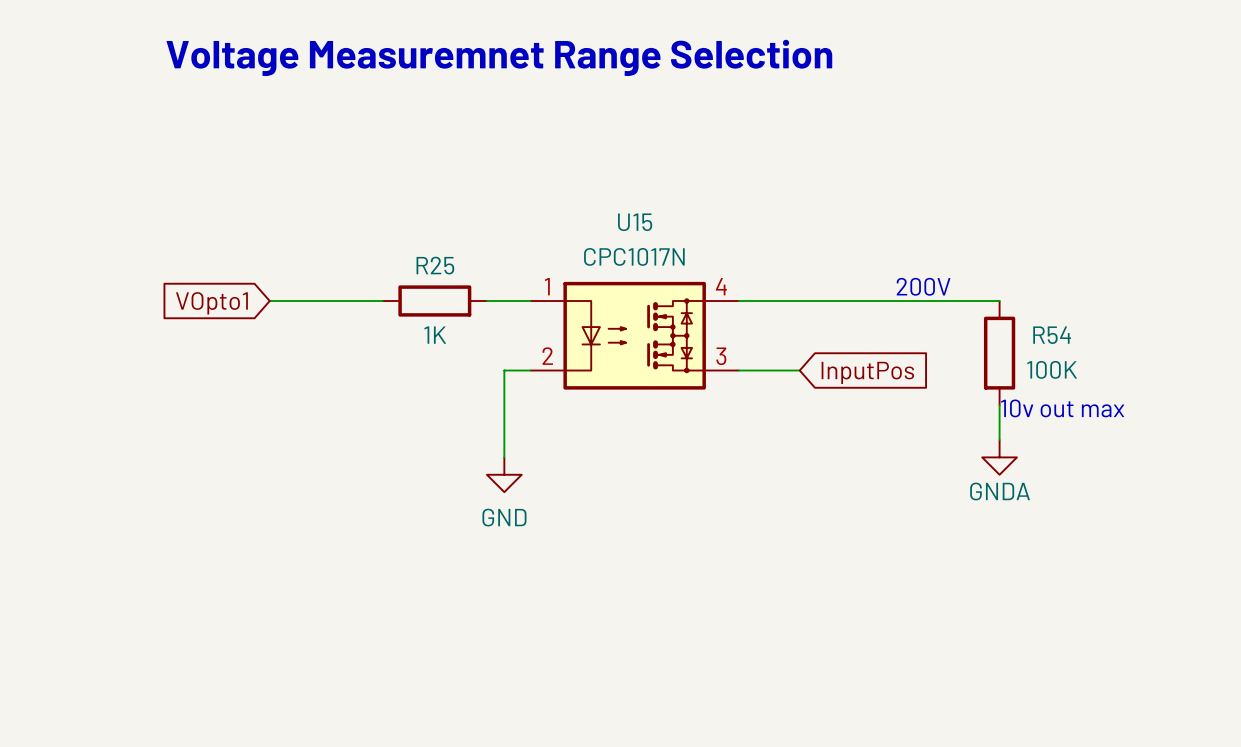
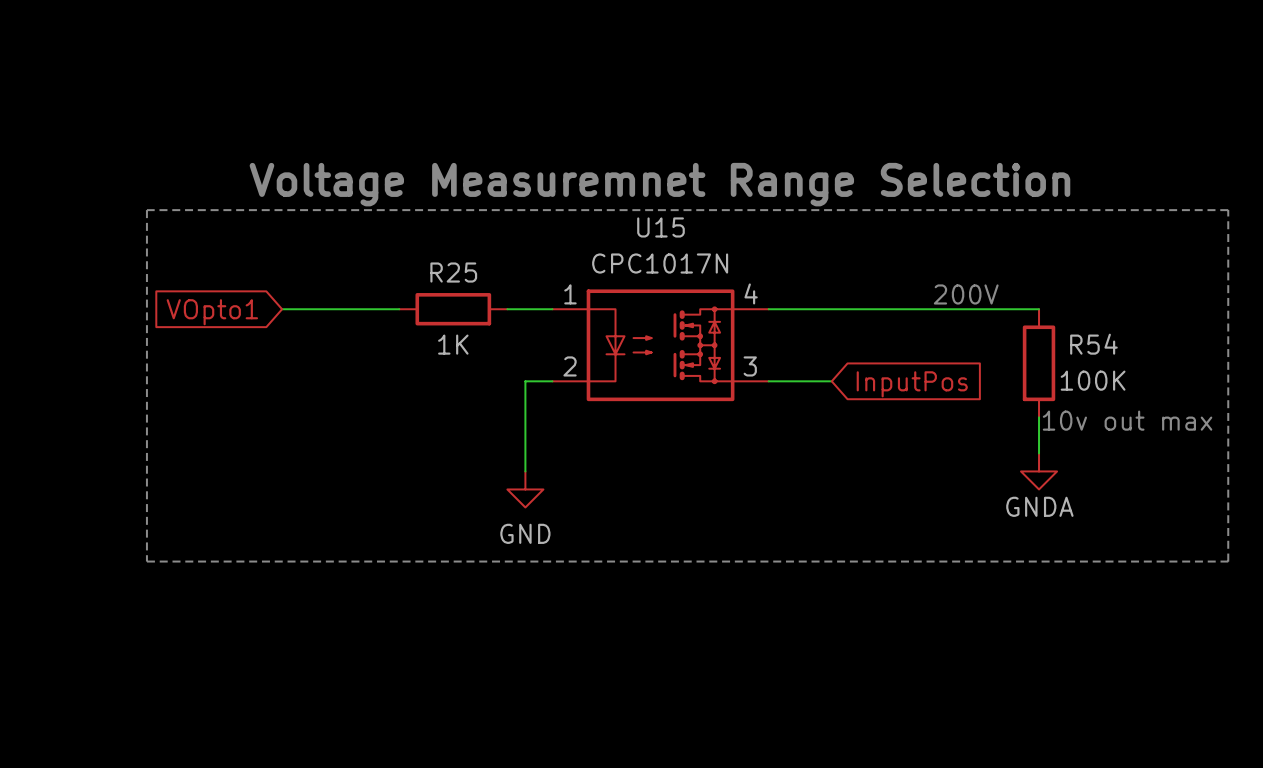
text position: Voltage Measuremnet Range Selection (499, 57) -> Voltage Measuremnet Range Selection (659, 184)
line: none -> (146, 210) (146, 561) (1228, 561) (1228, 210) (146, 210)

